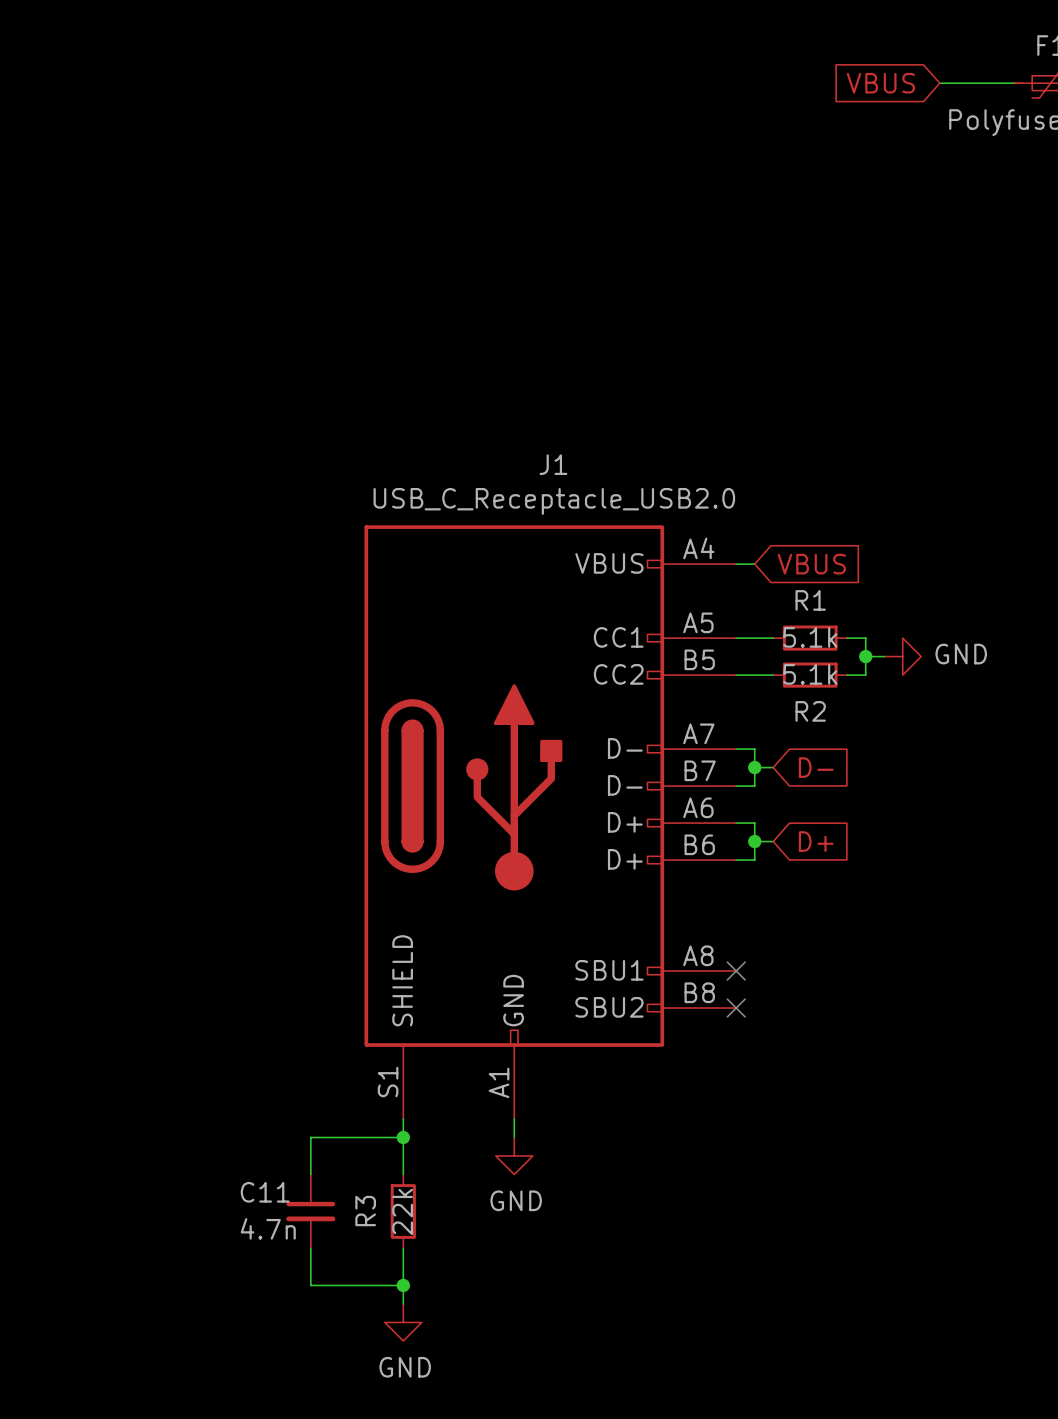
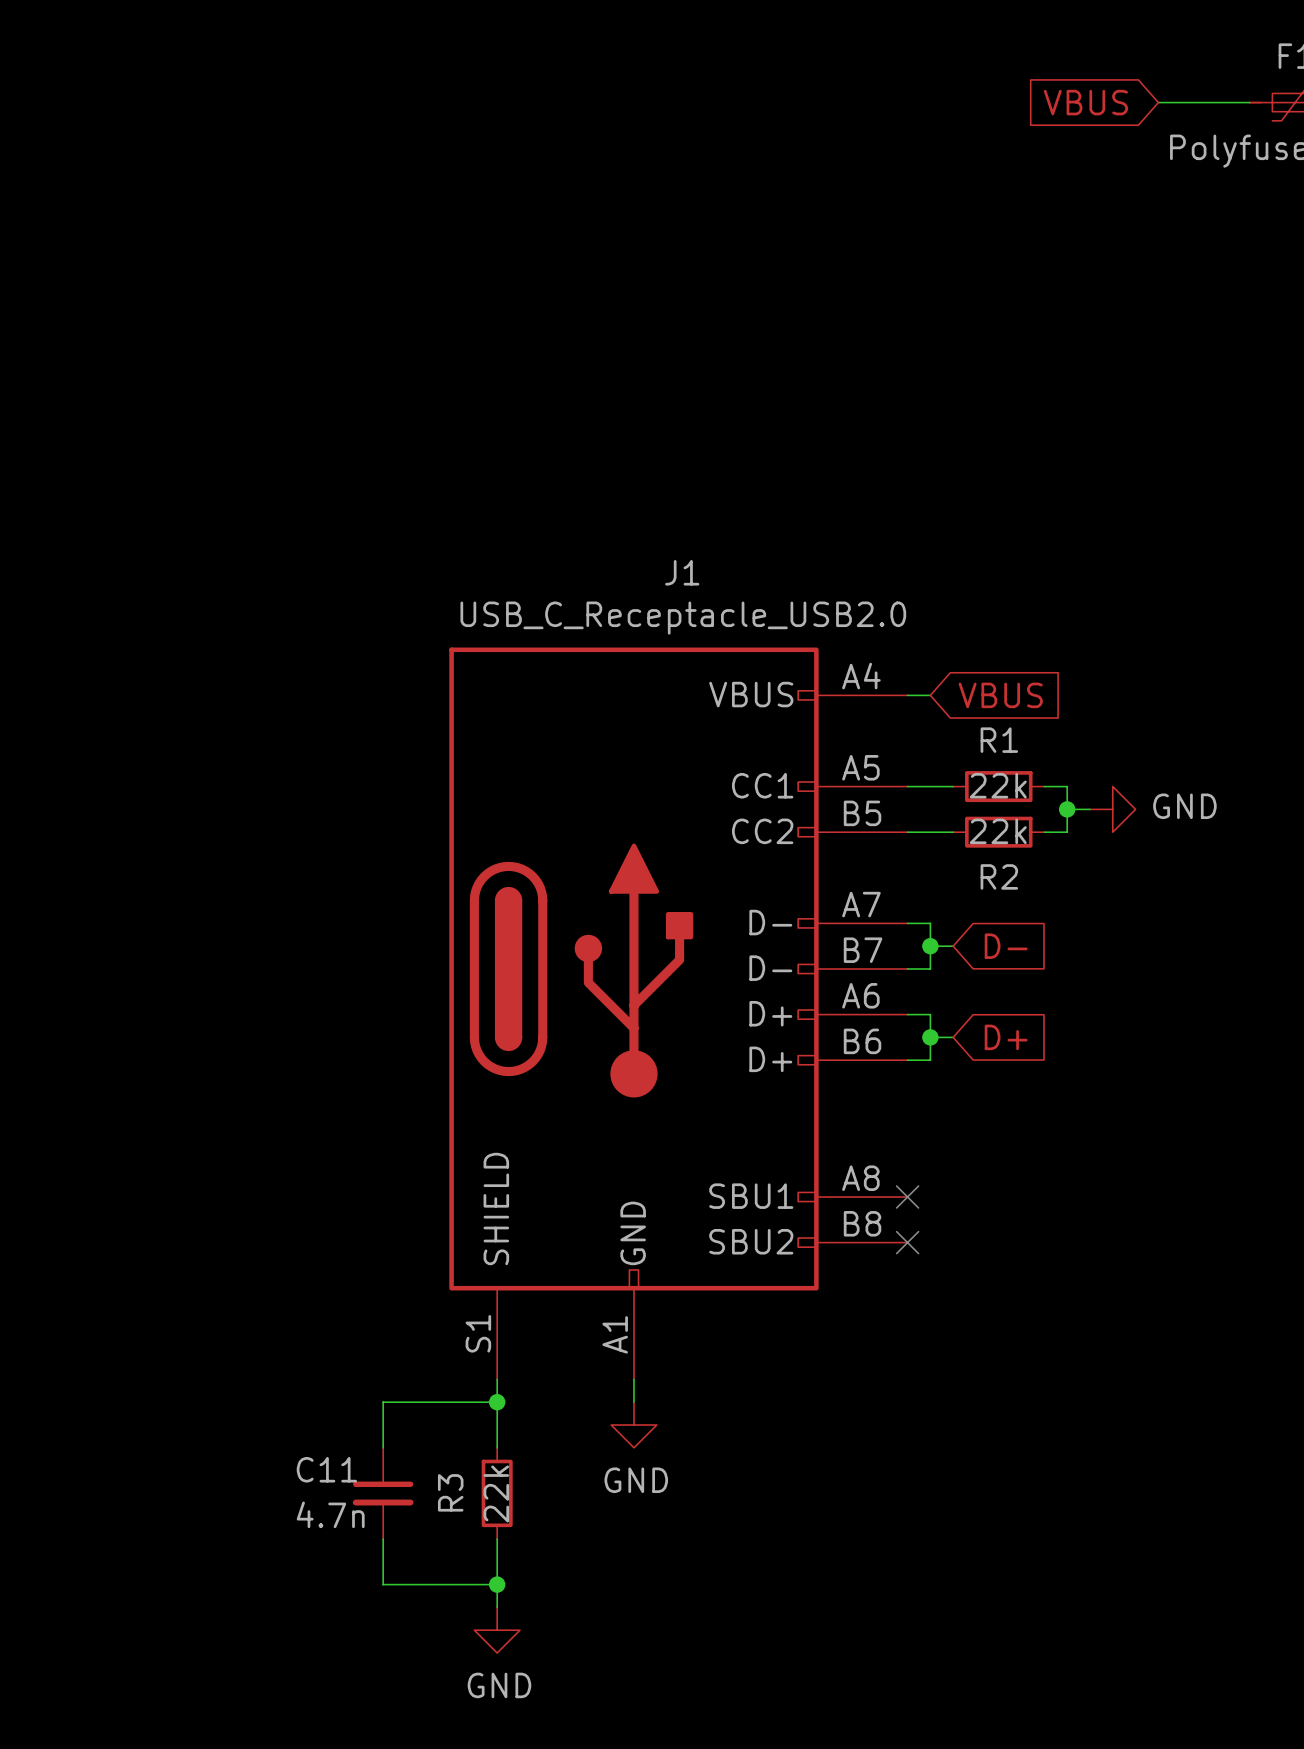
R1 value: 5.1k (810, 637) -> 22k (998, 785)
R2 value: 5.1k (810, 674) -> 22k (998, 831)

